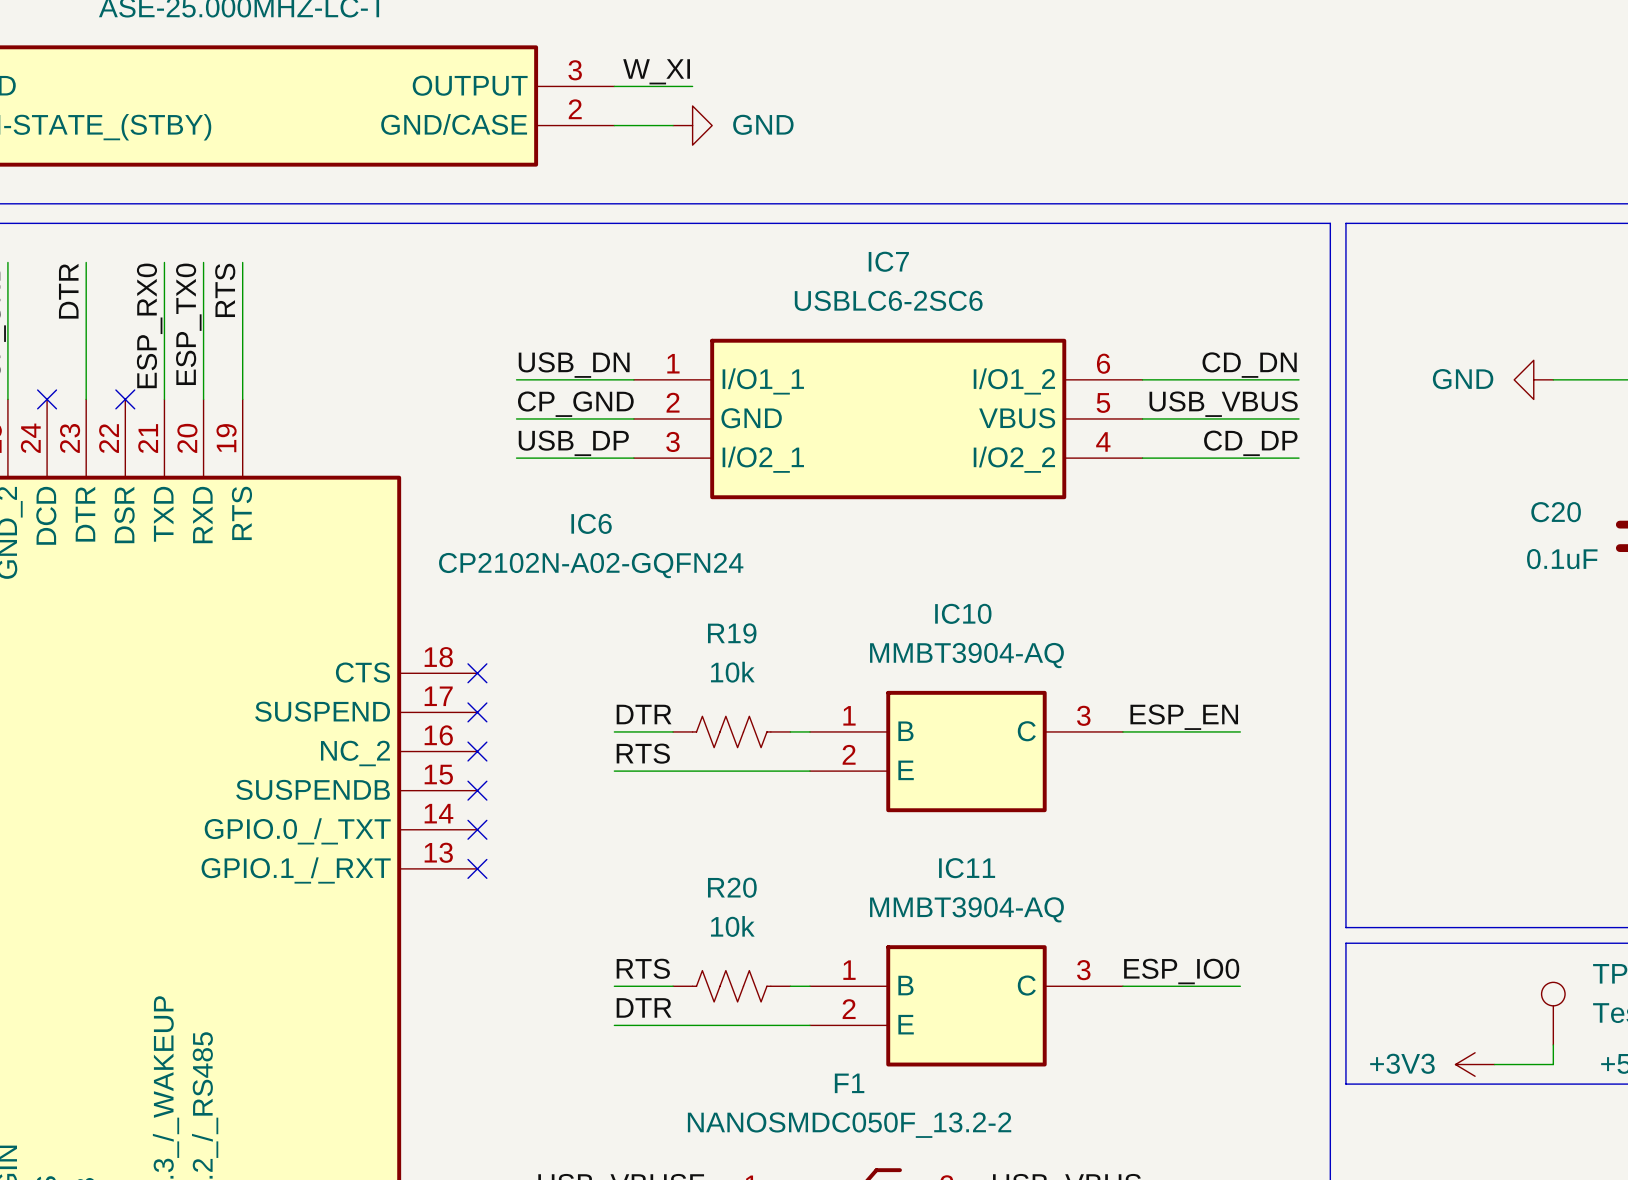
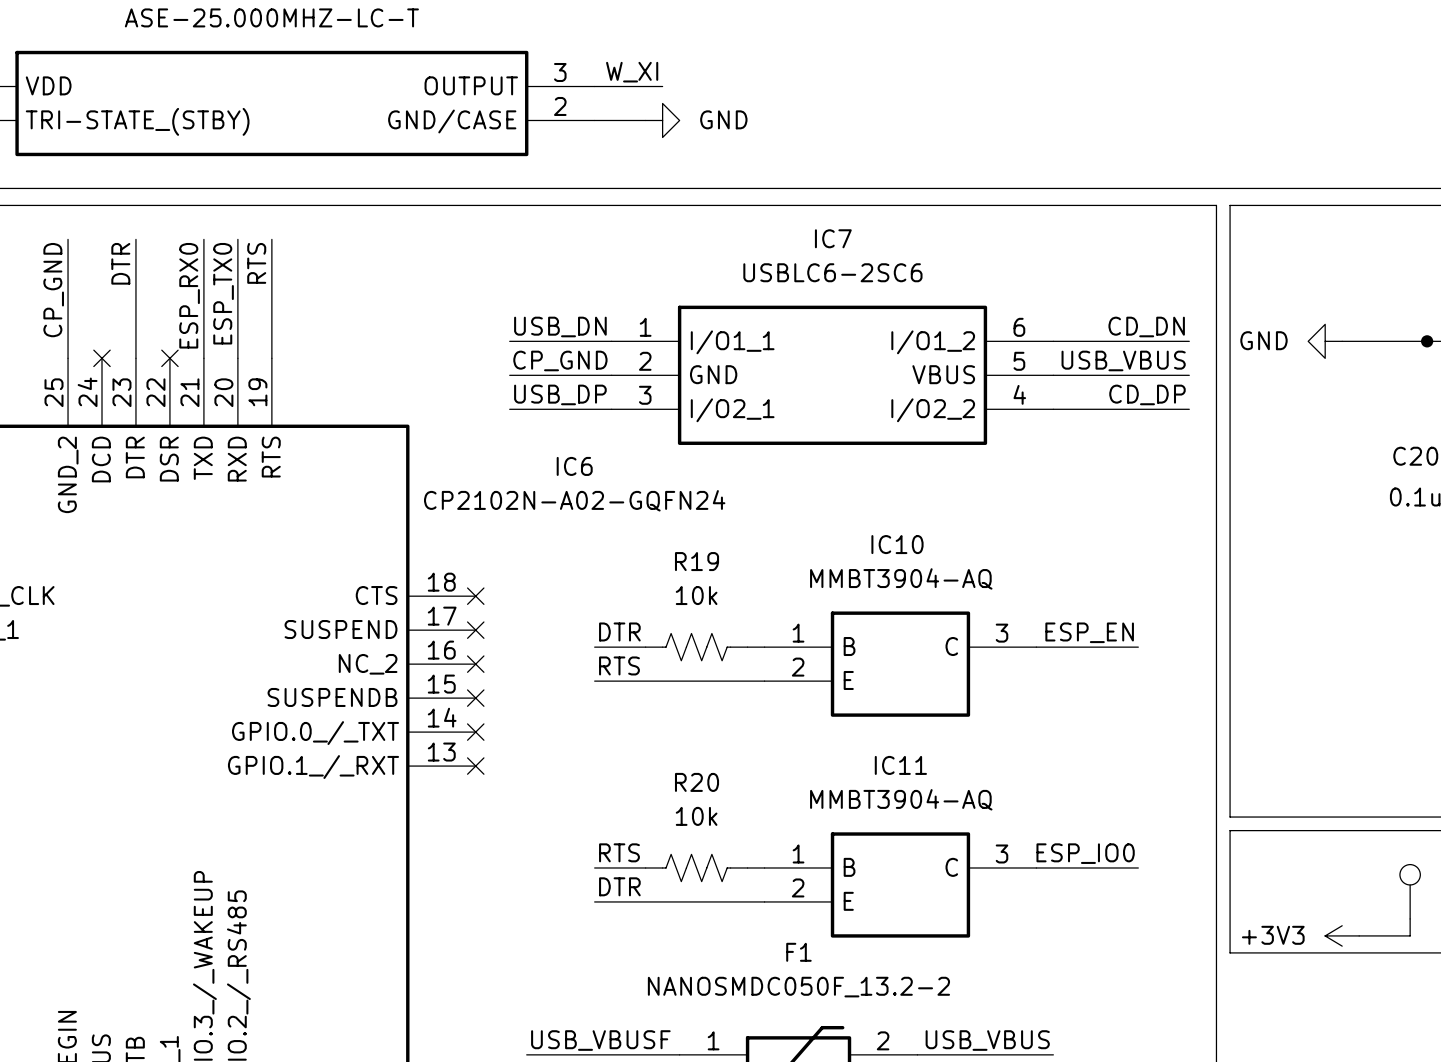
wire: none -> (1342, 341) (1410, 341)
power symbol position: GND (1533, 379) -> GND (1325, 341)
junction: none -> (1427, 341)

